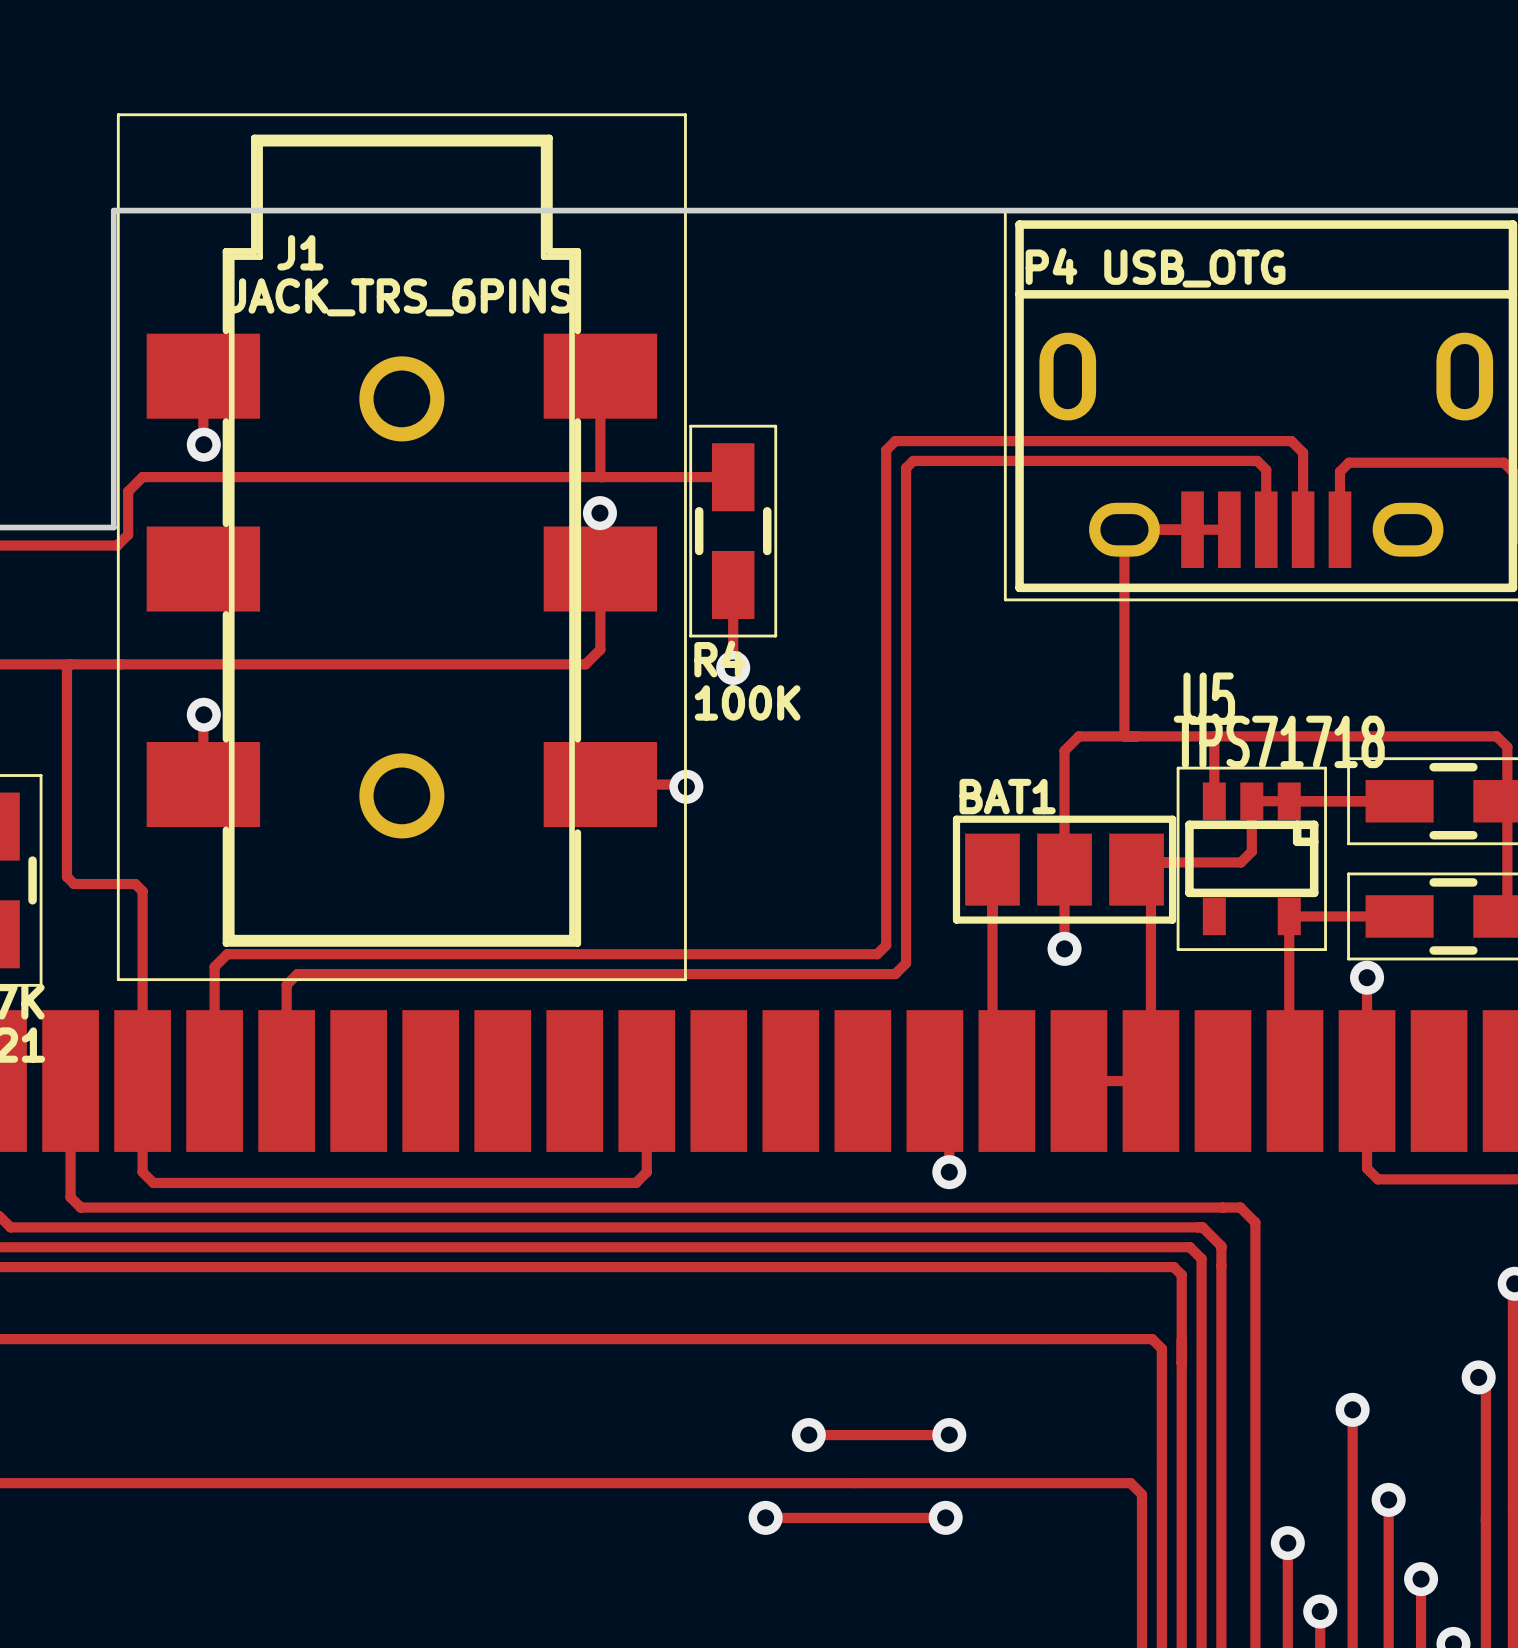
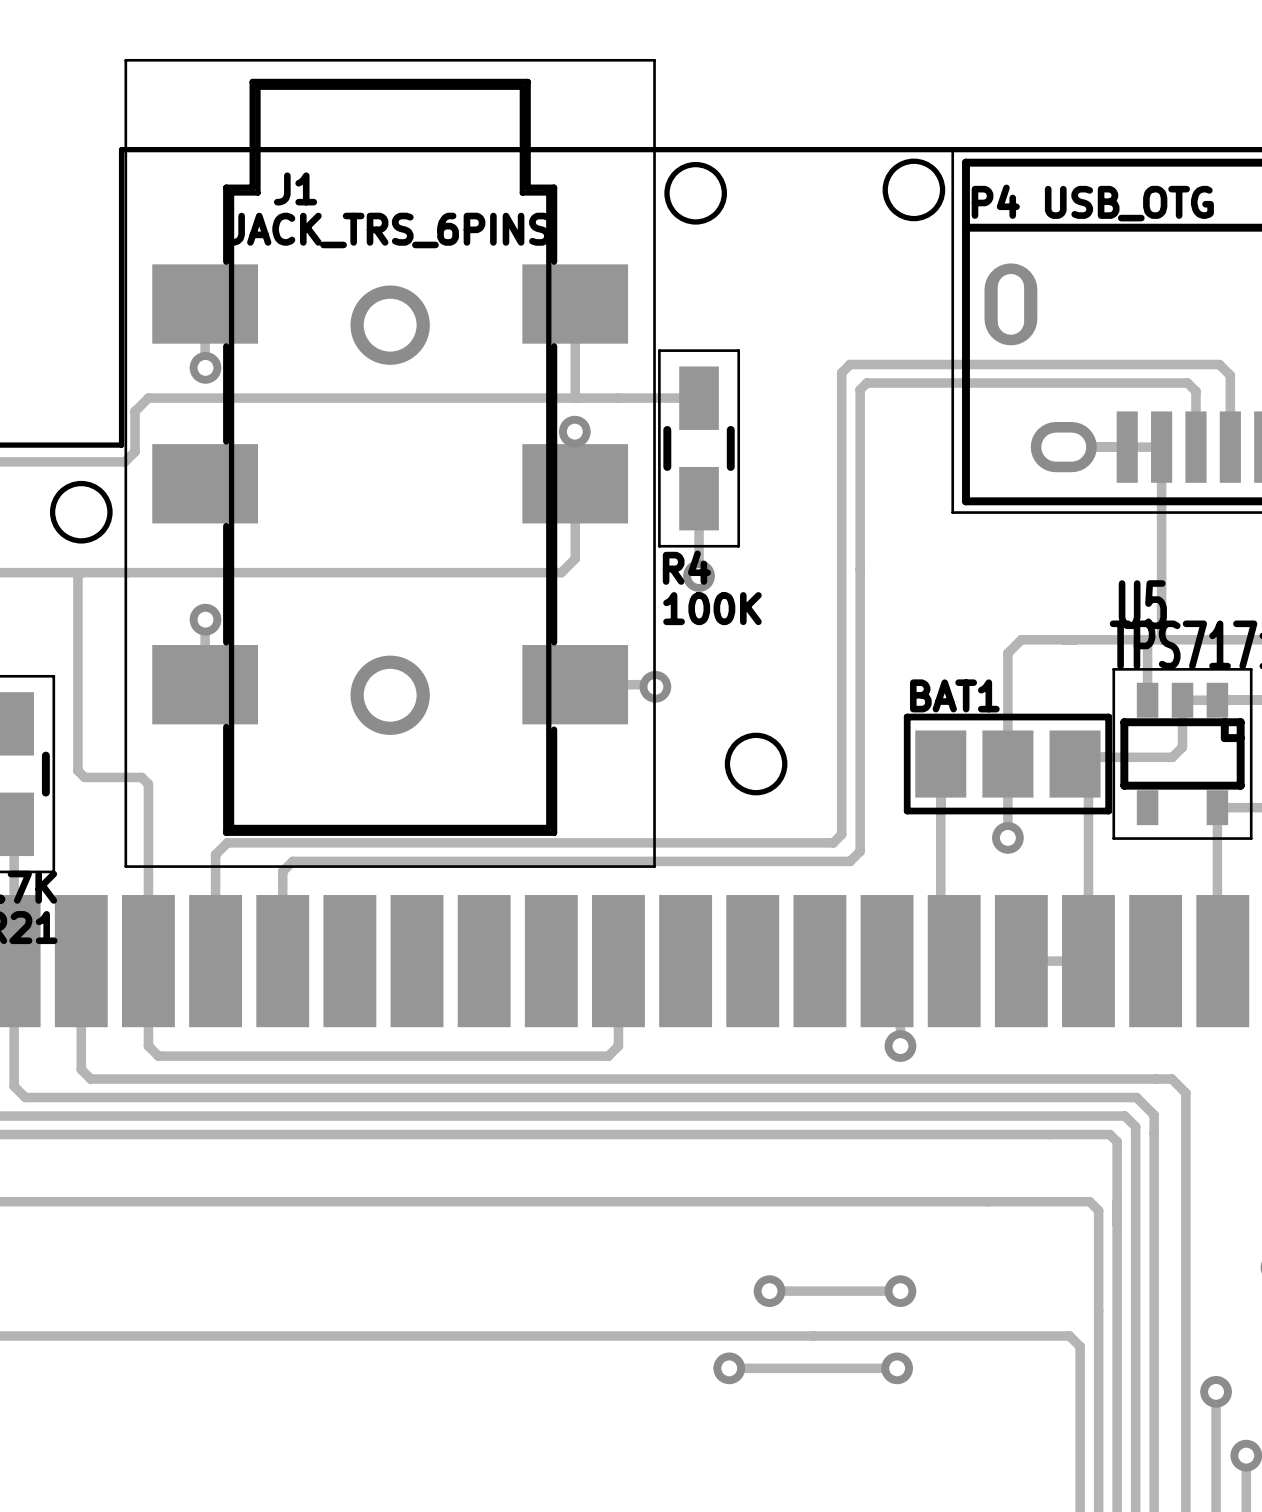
round board edge: none -> [882, 158, 946, 222]
round board edge: none -> [664, 161, 728, 225]
track: (1124, 529) (1124, 736) -> (1161, 447) (1161, 639)
round board edge: none -> [49, 480, 113, 544]
round board edge: none -> [724, 732, 788, 796]

